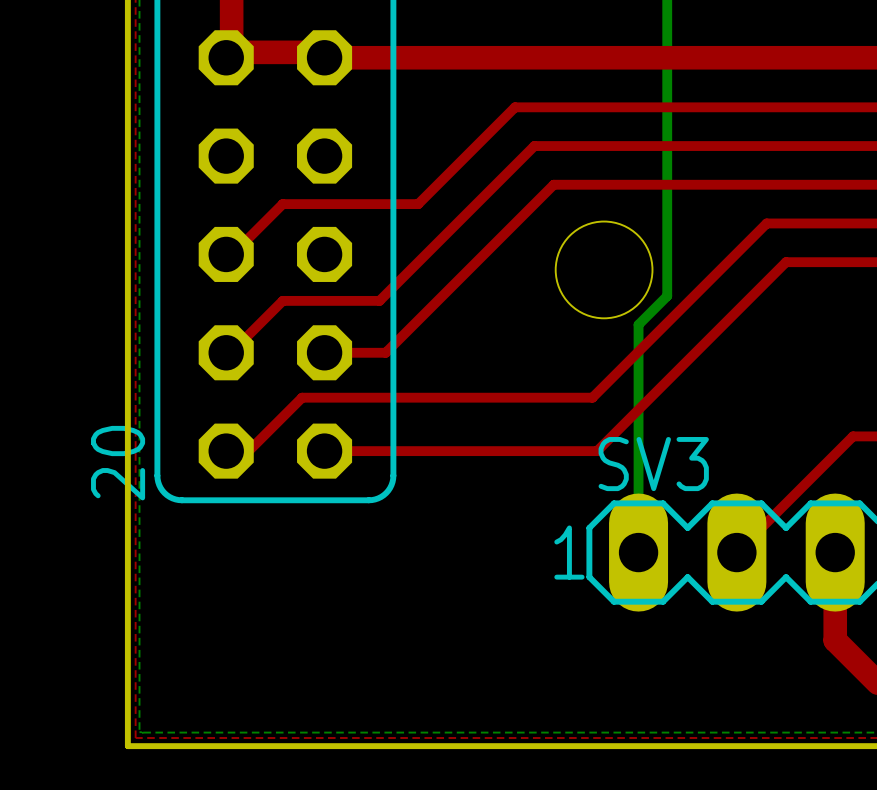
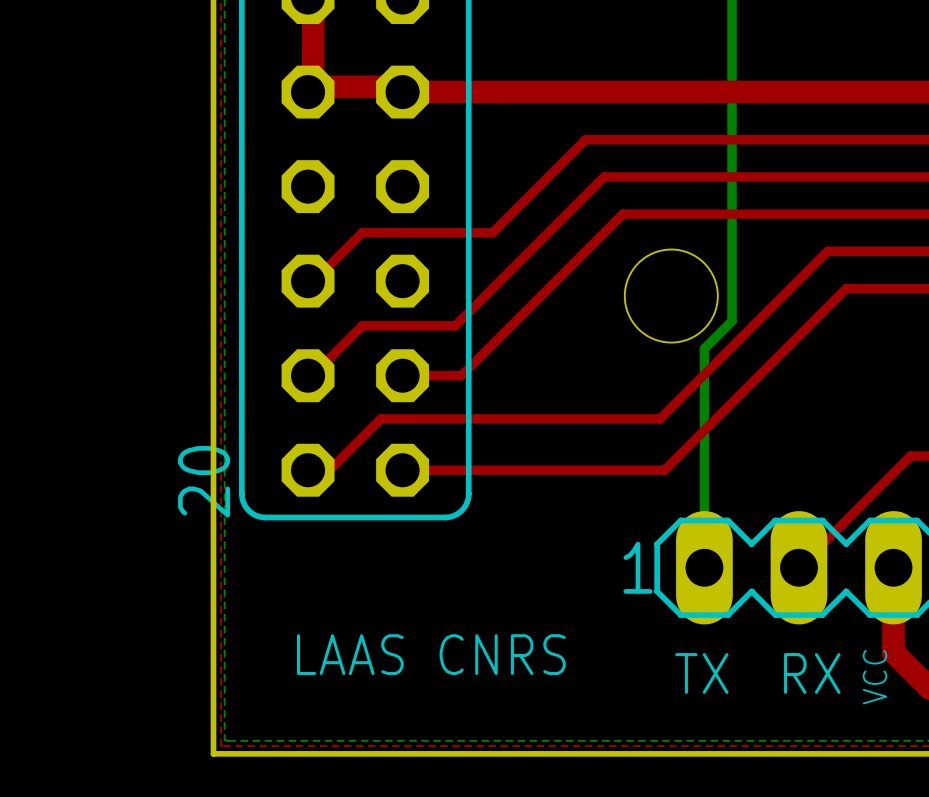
SV3 name: SV3 (653, 464) -> none
text: none -> LAAS CNRS (431, 654)
text: none -> TX (701, 673)
text: none -> RX (812, 673)
text: none -> VCC (875, 677)

